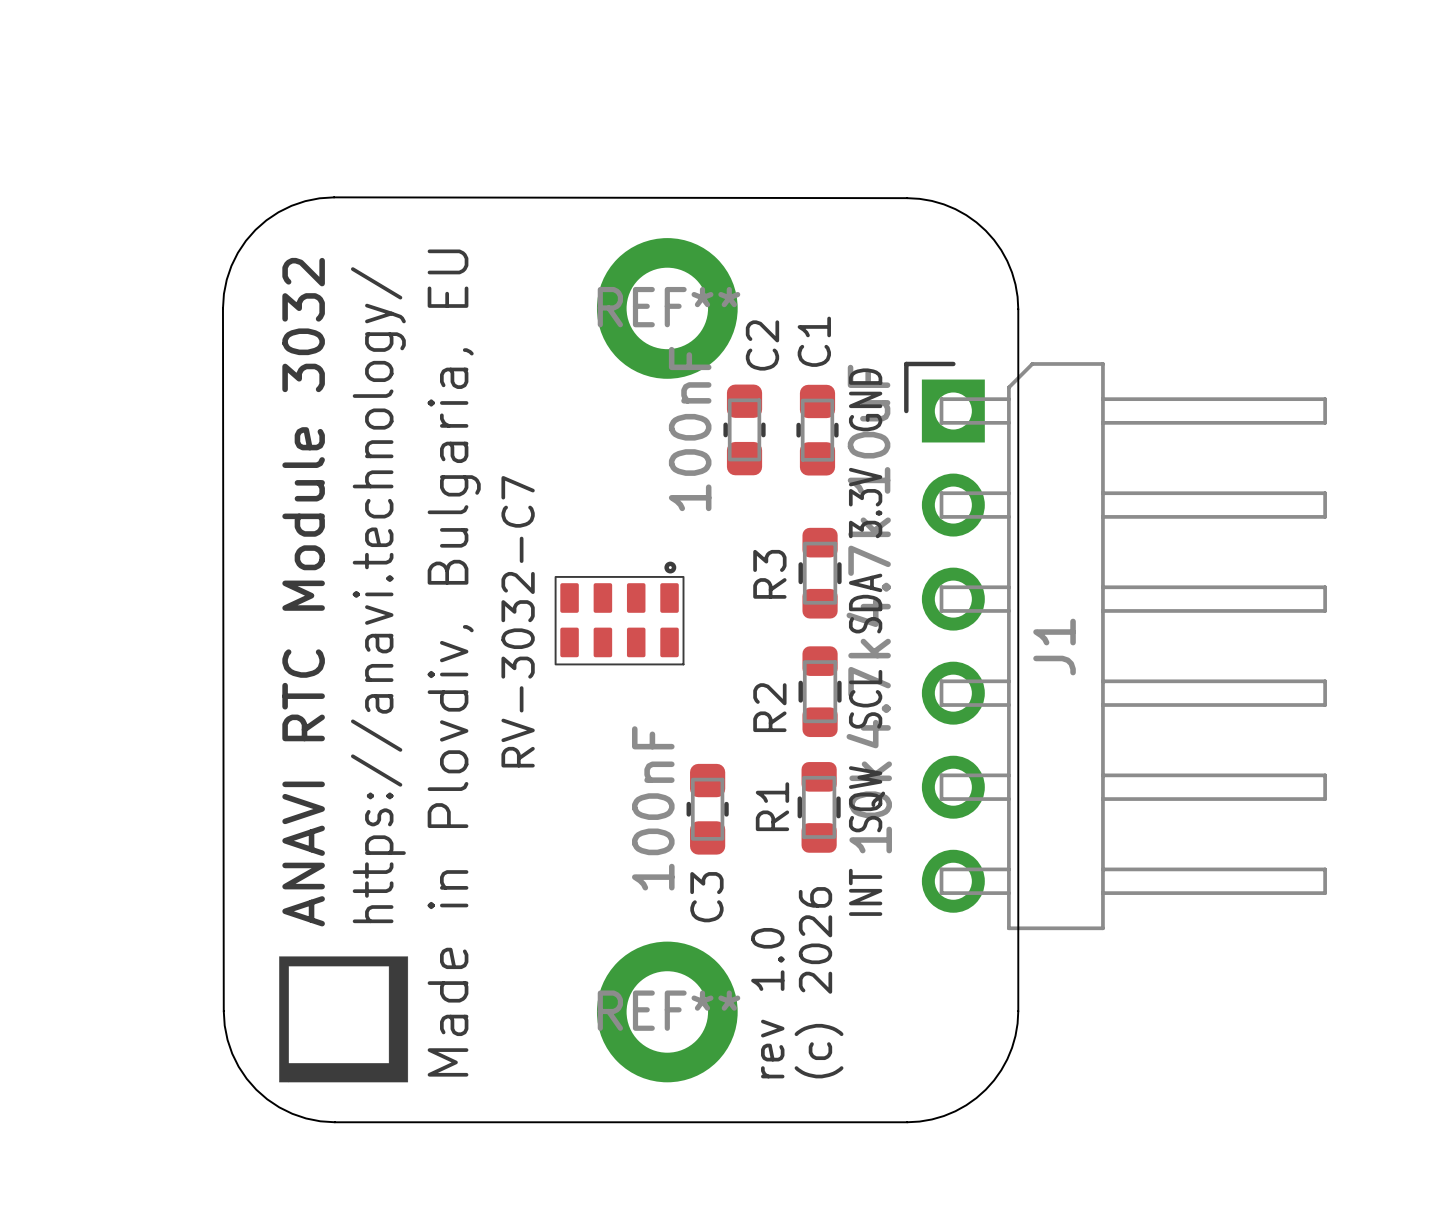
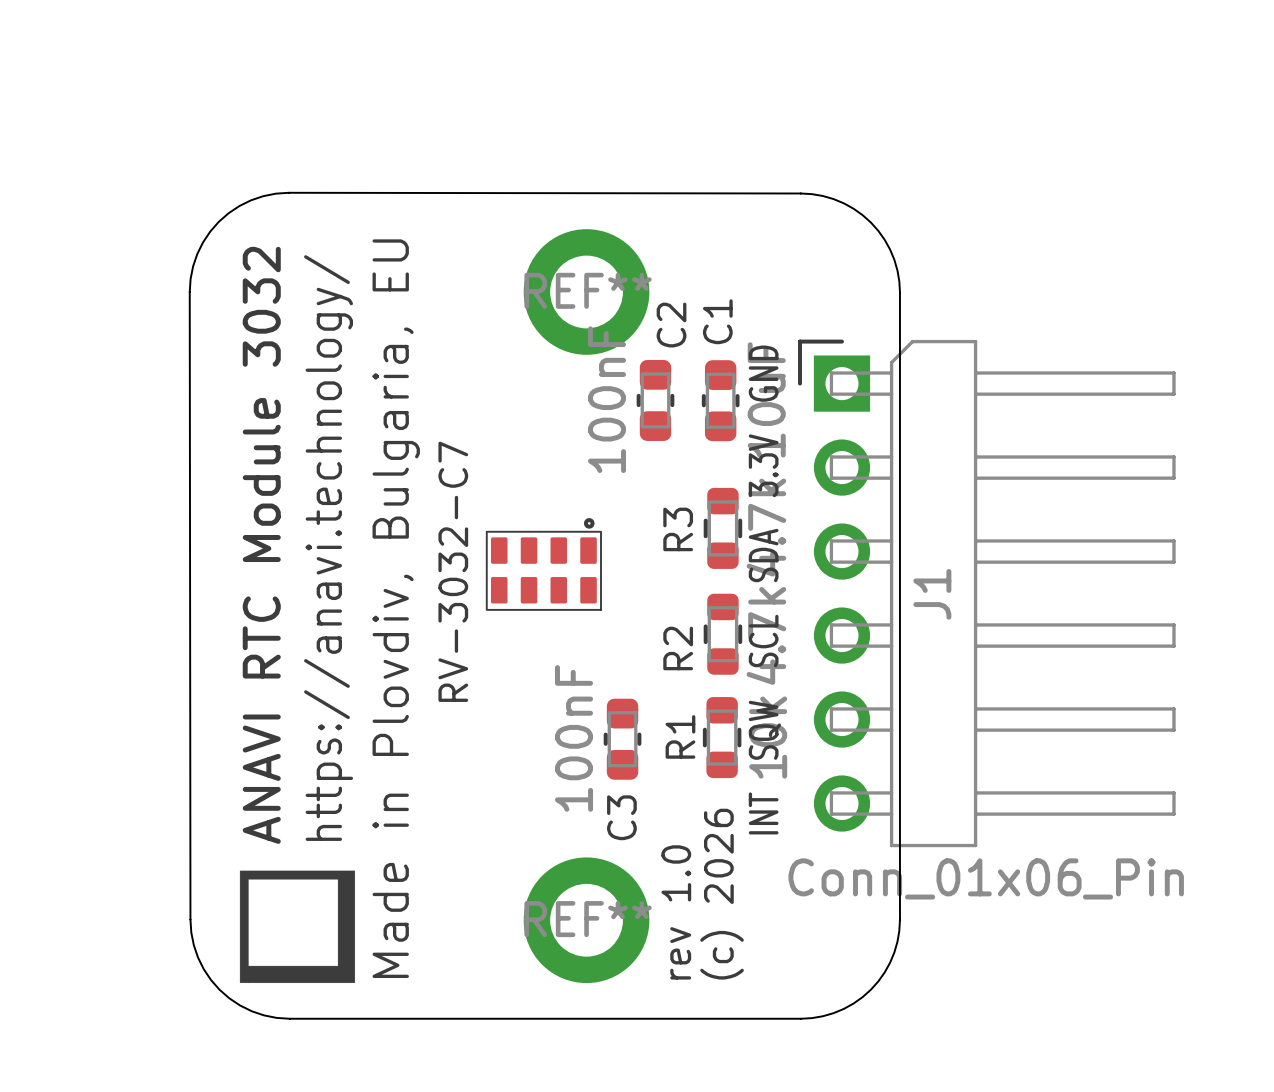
J1 value: none -> Conn_01x06_Pin (986, 878)

